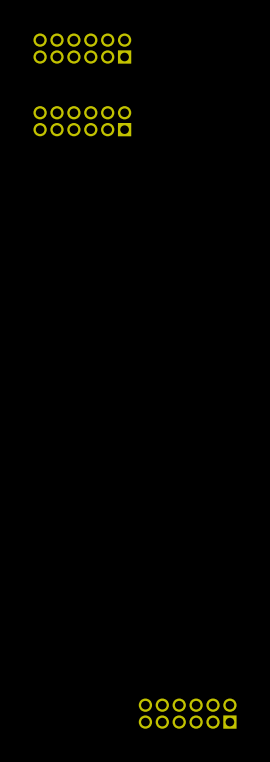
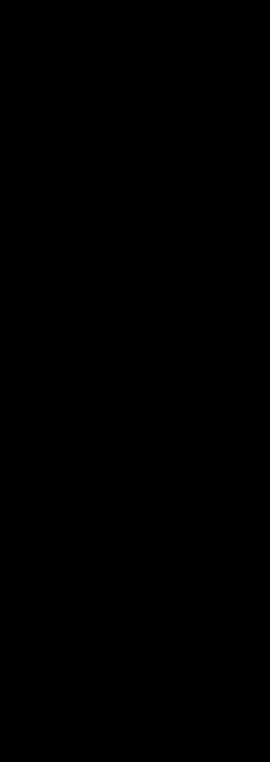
part: (82, 48) -> none
part: (82, 121) -> none
part: (187, 713) -> none

